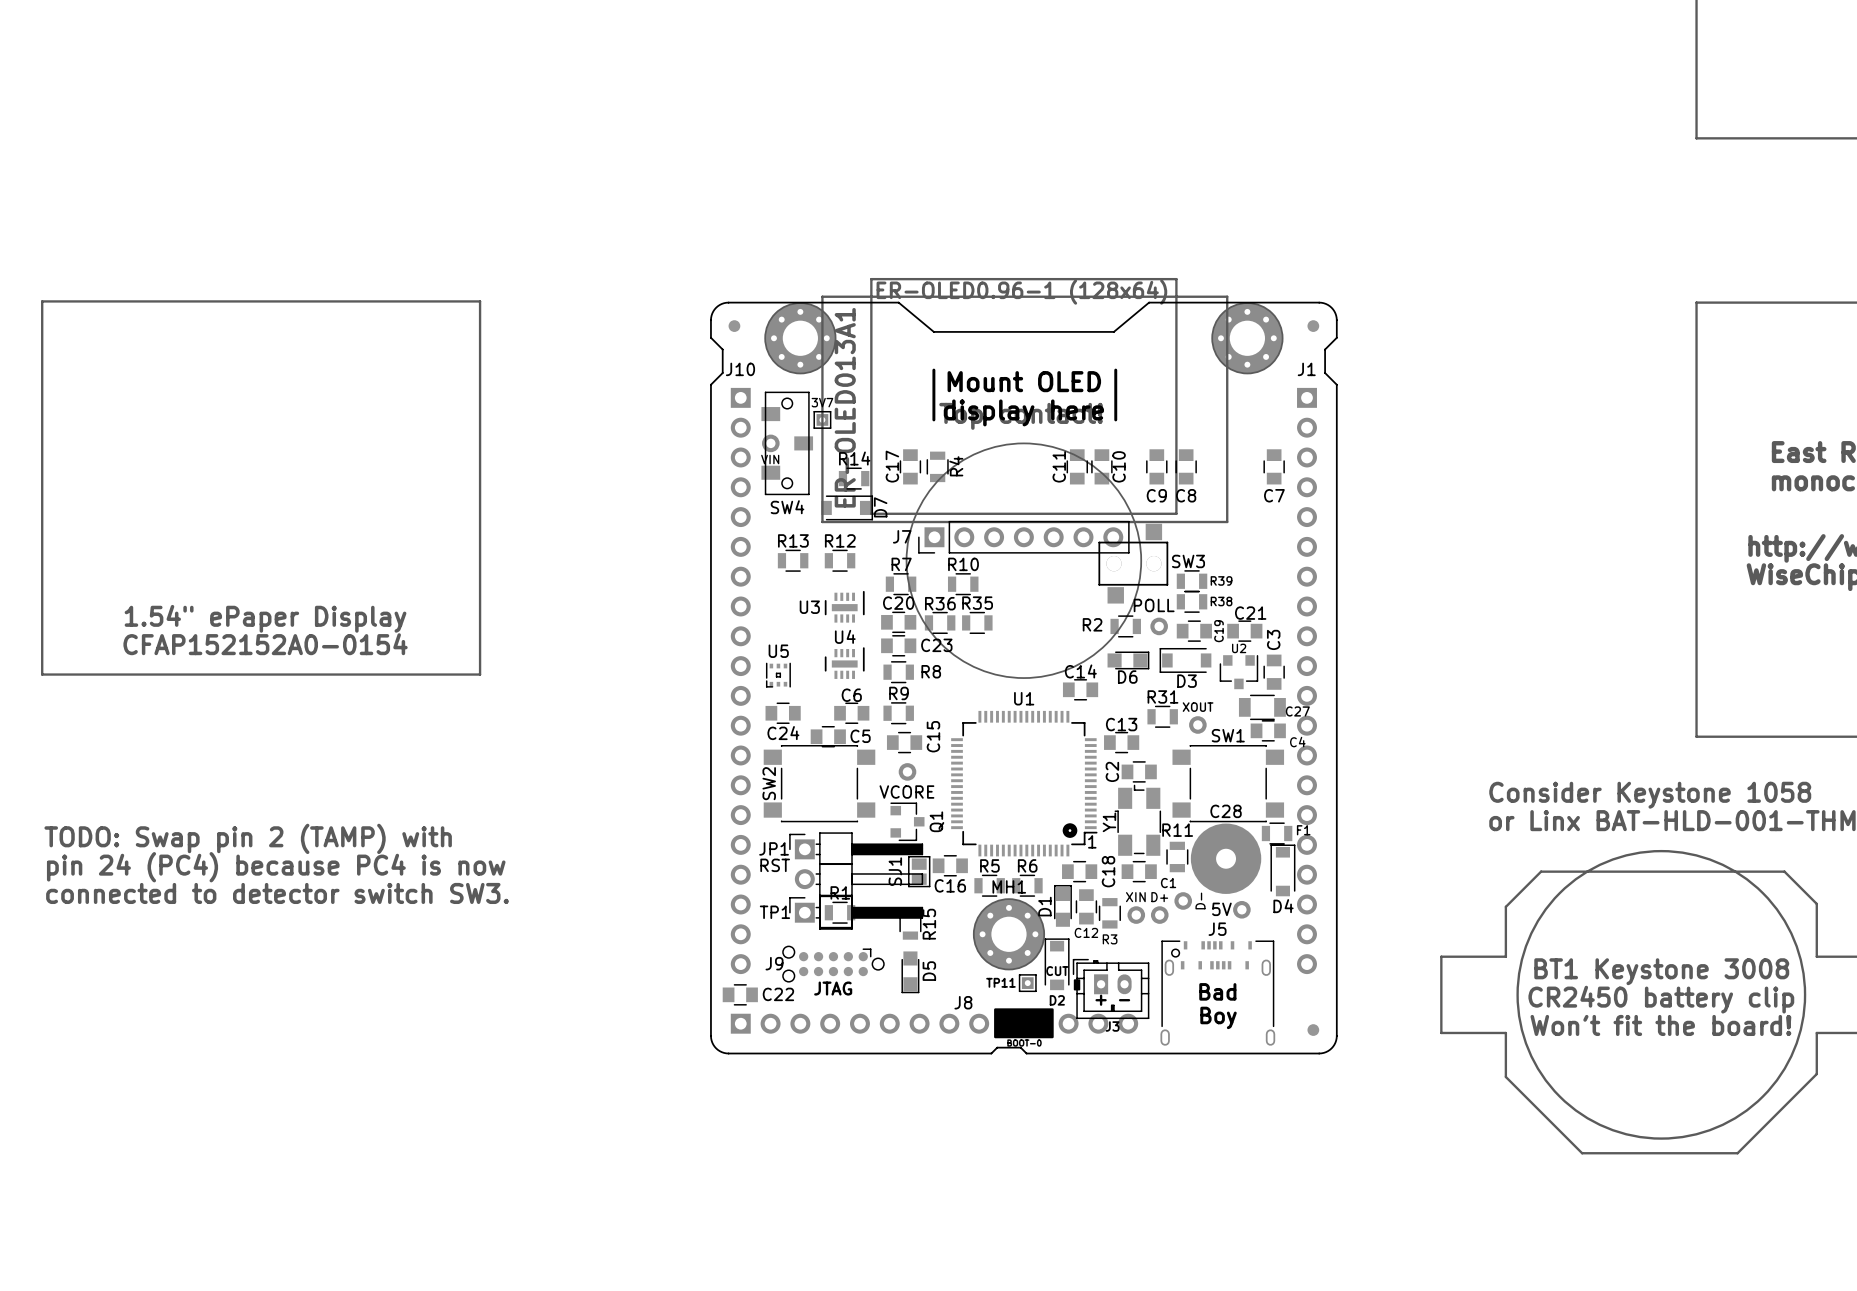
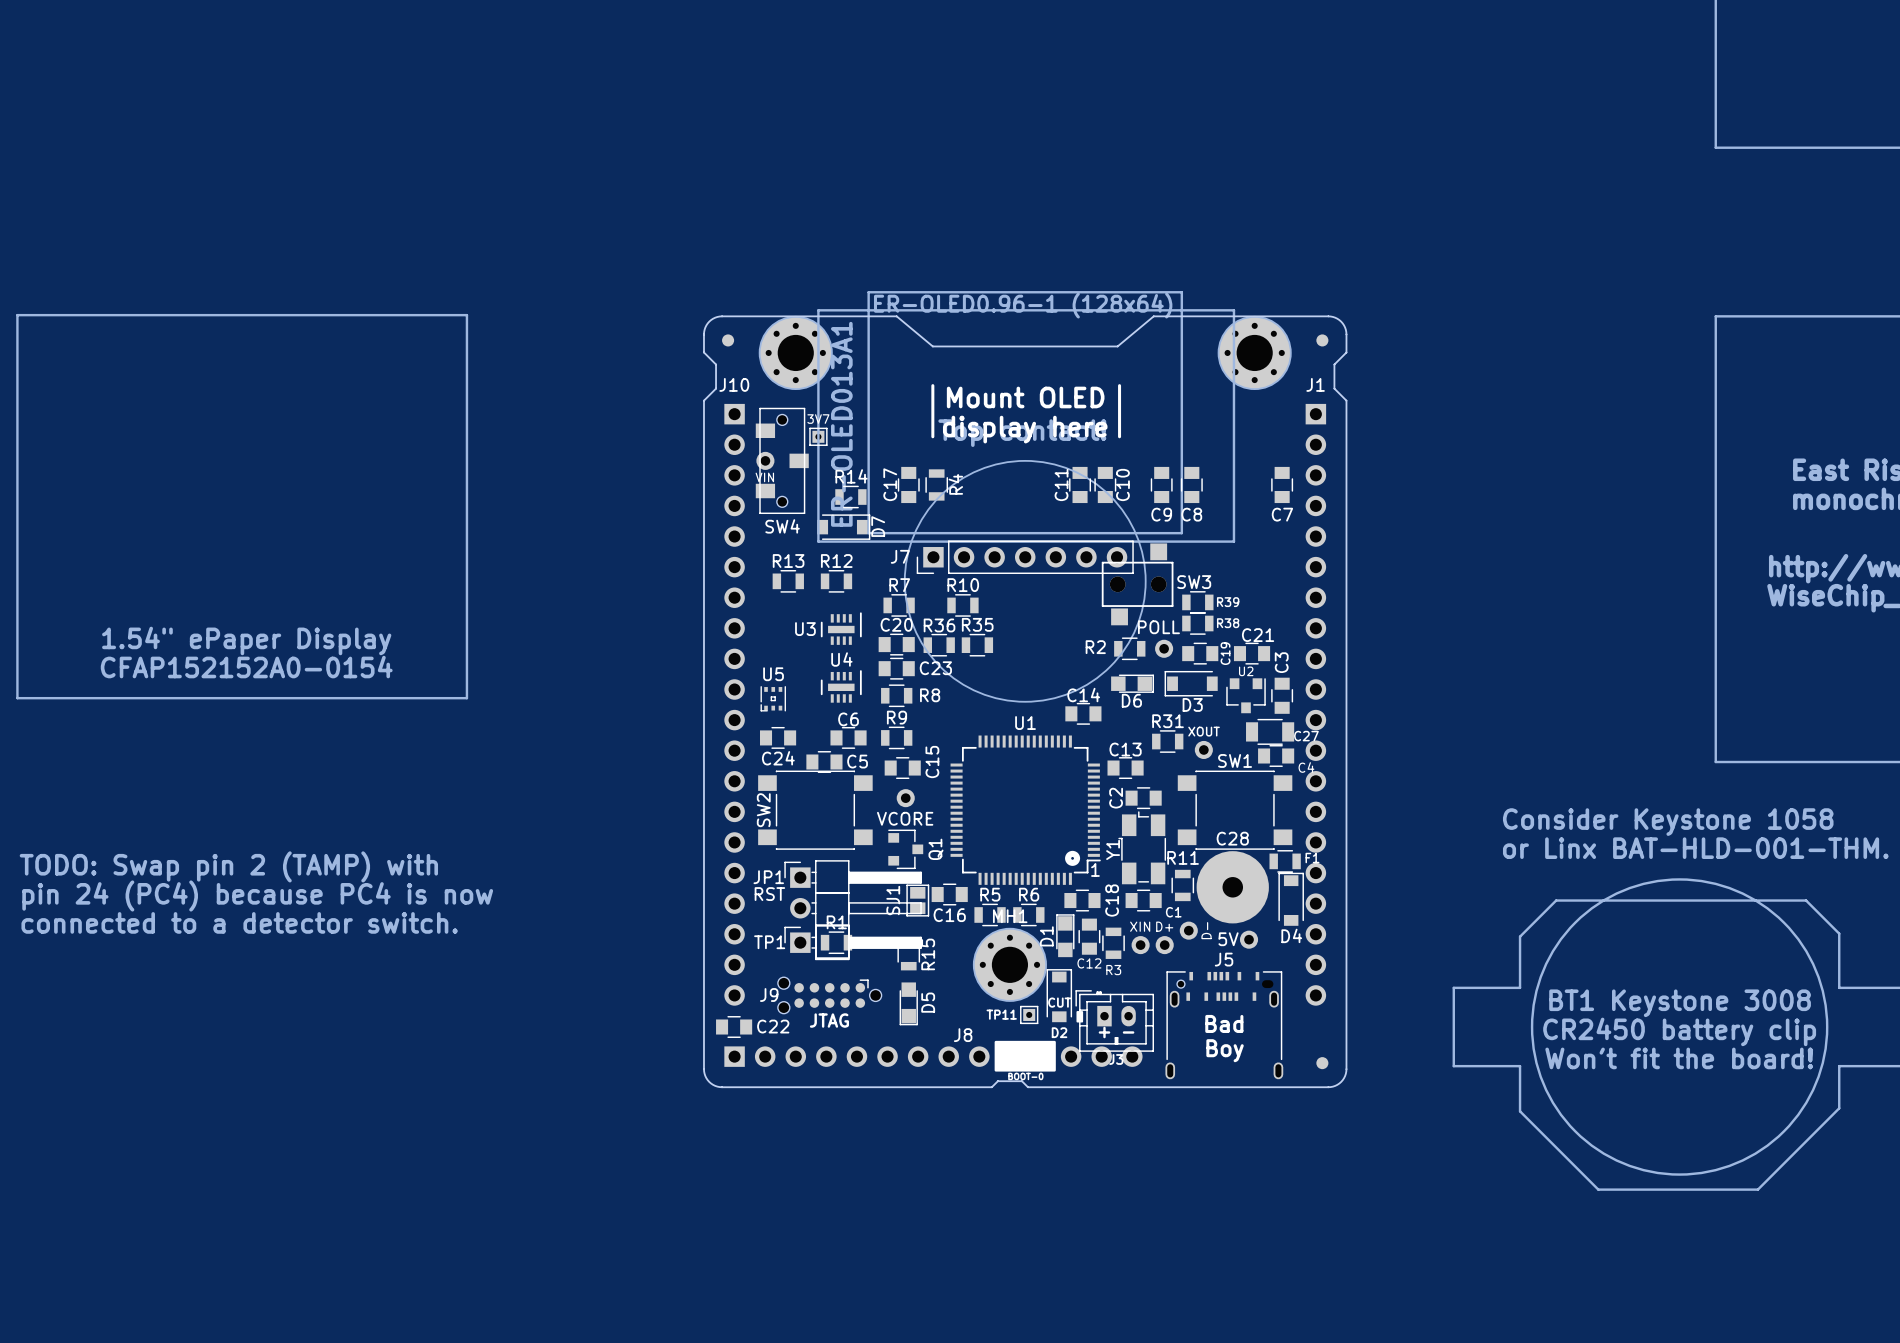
text: connected to detector switch SW3. (277, 893) -> connected to a detector switch. (239, 922)

